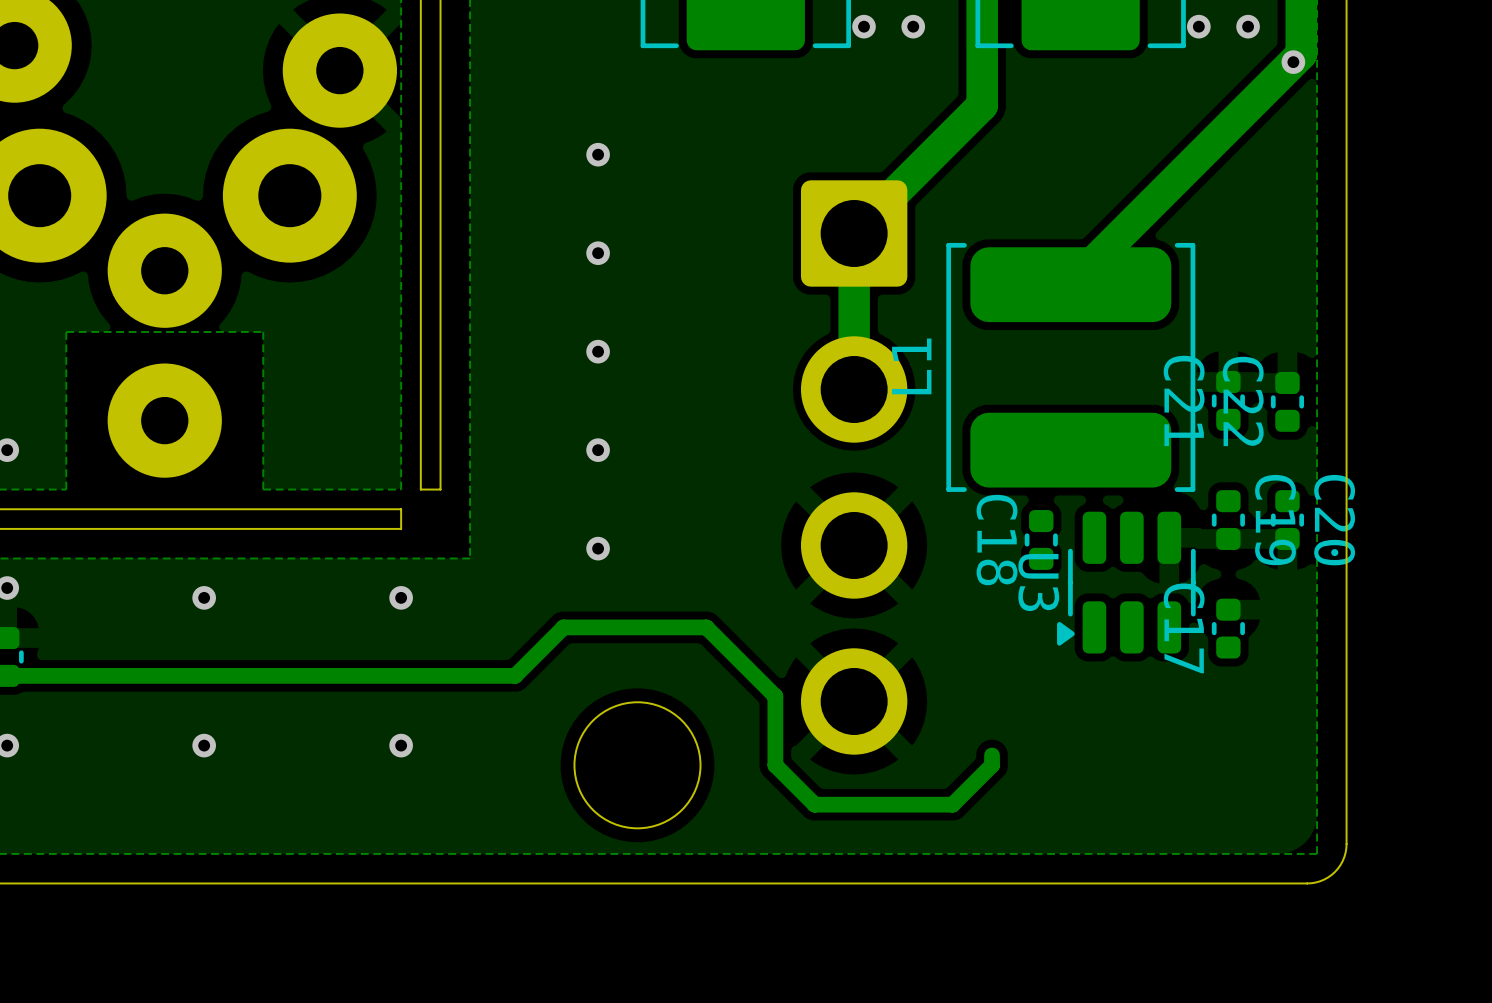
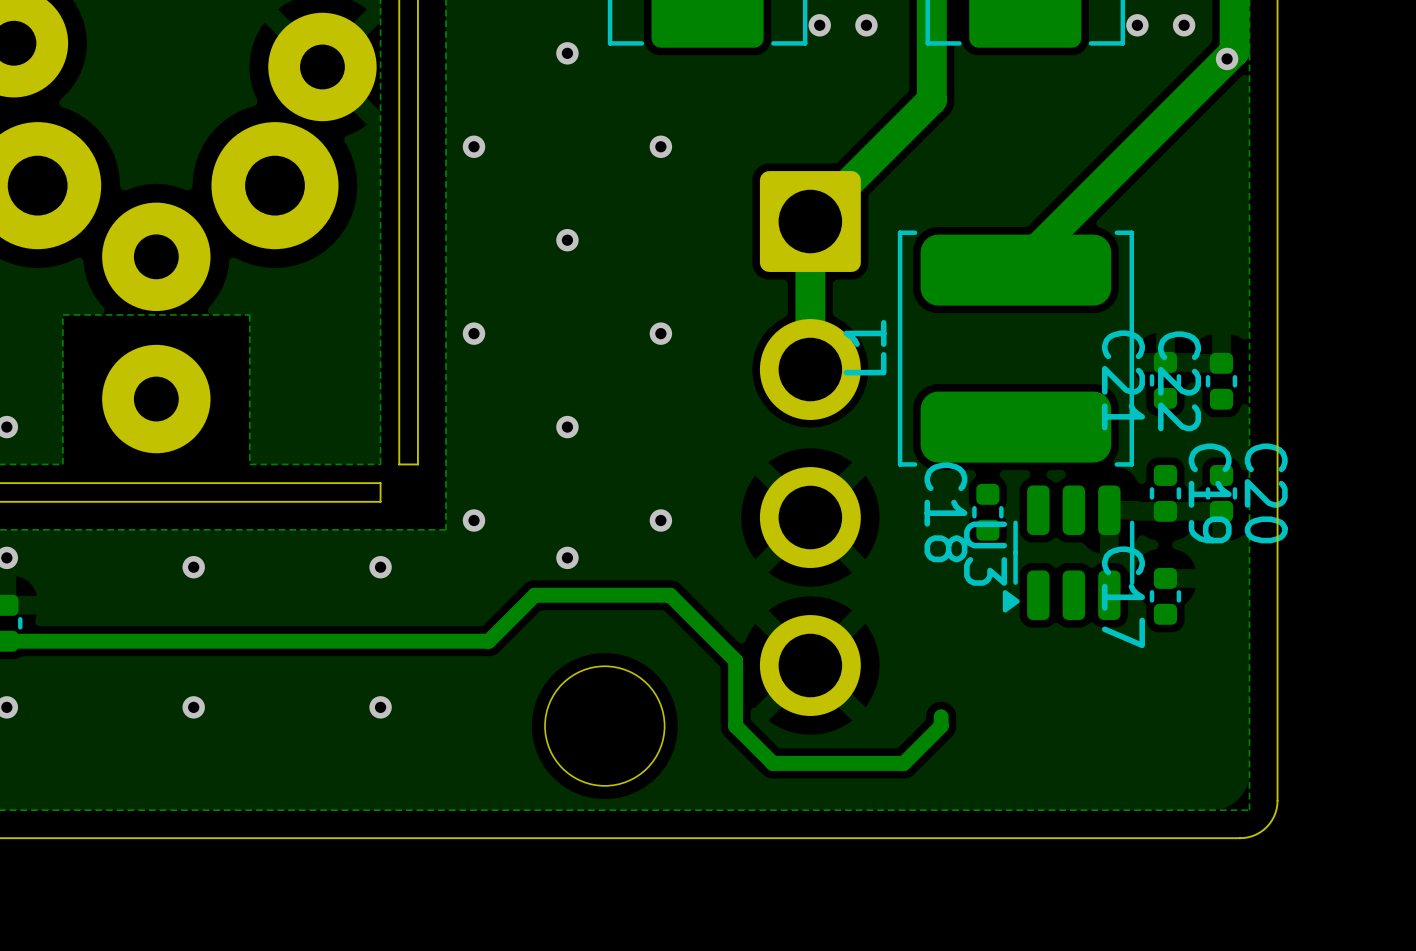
via: none -> (567, 53)
via: none -> (474, 146)
via: (598, 154) -> none
via: none -> (660, 146)
via: none -> (474, 333)
via: (598, 351) -> none
via: none -> (660, 333)
via: none -> (474, 520)
via position: (598, 548) -> (567, 557)
via: none -> (660, 520)

